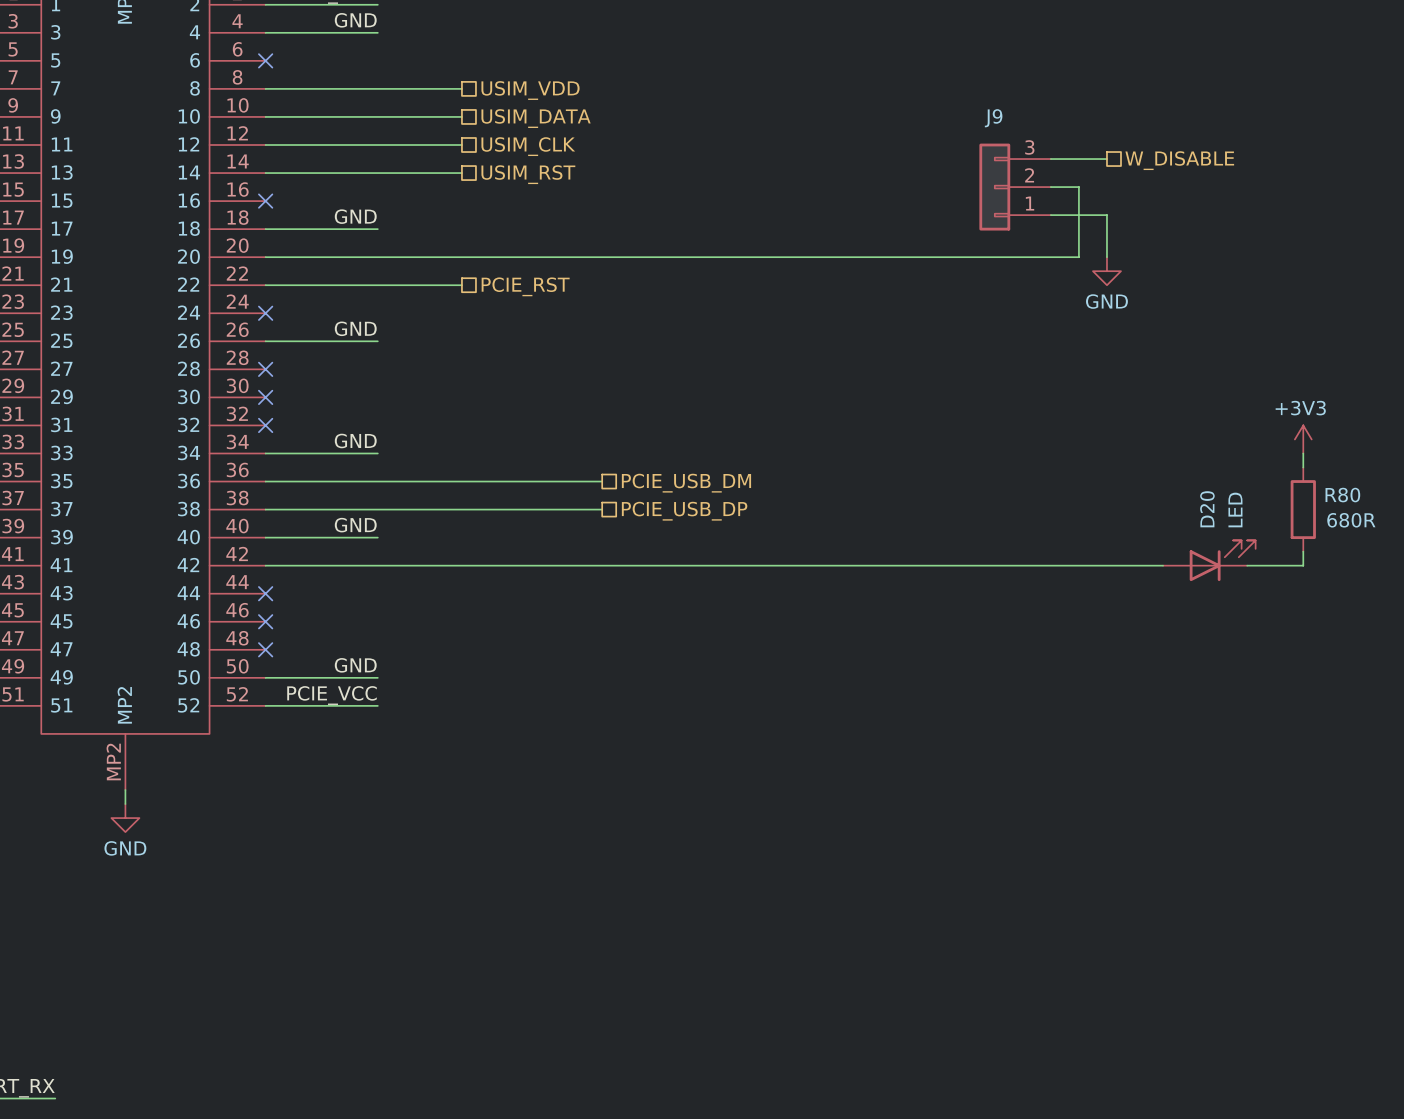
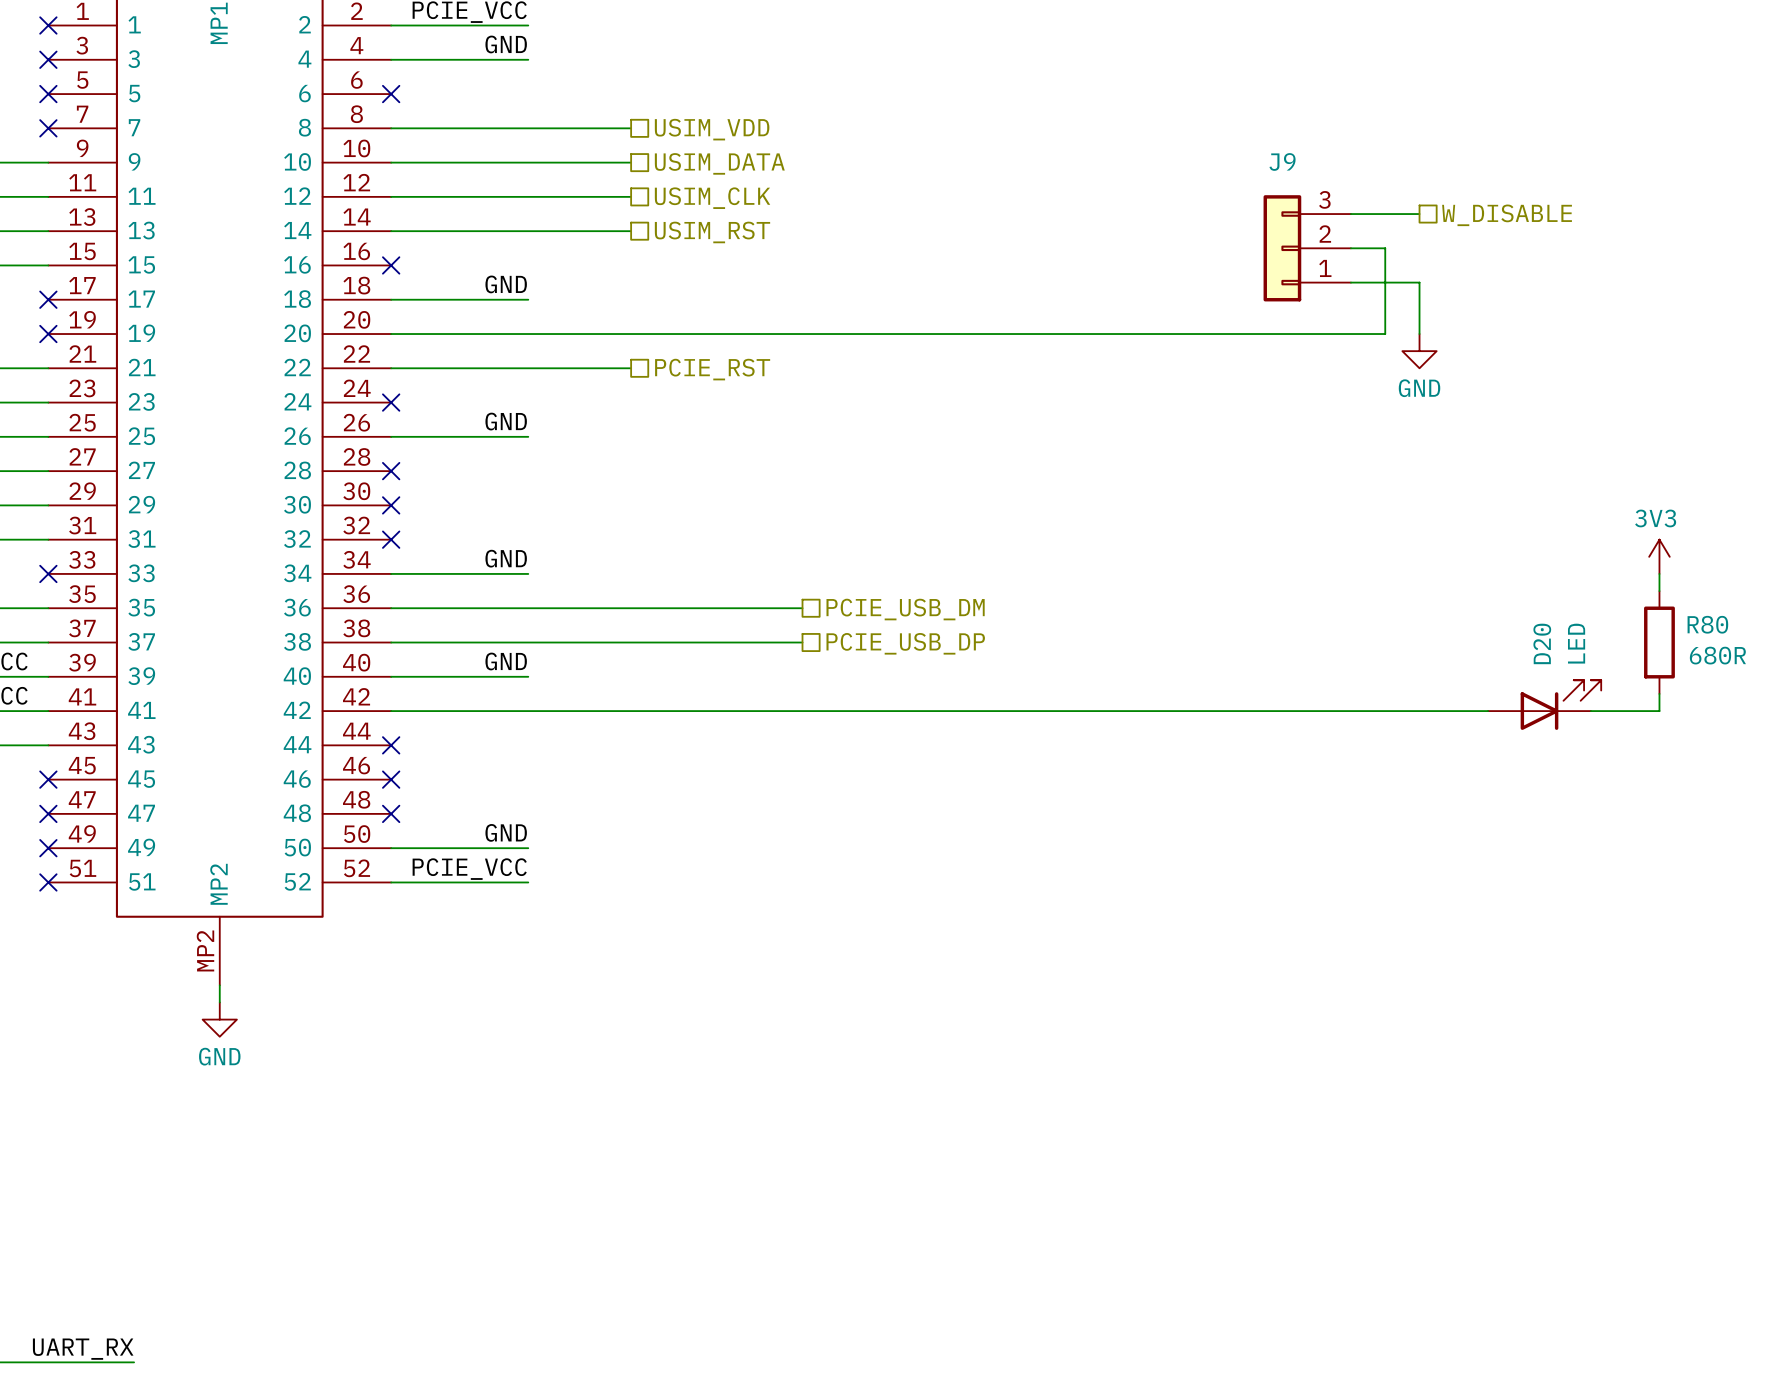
power symbol: +3V3 (1303, 439) -> 3V3 (1659, 556)

